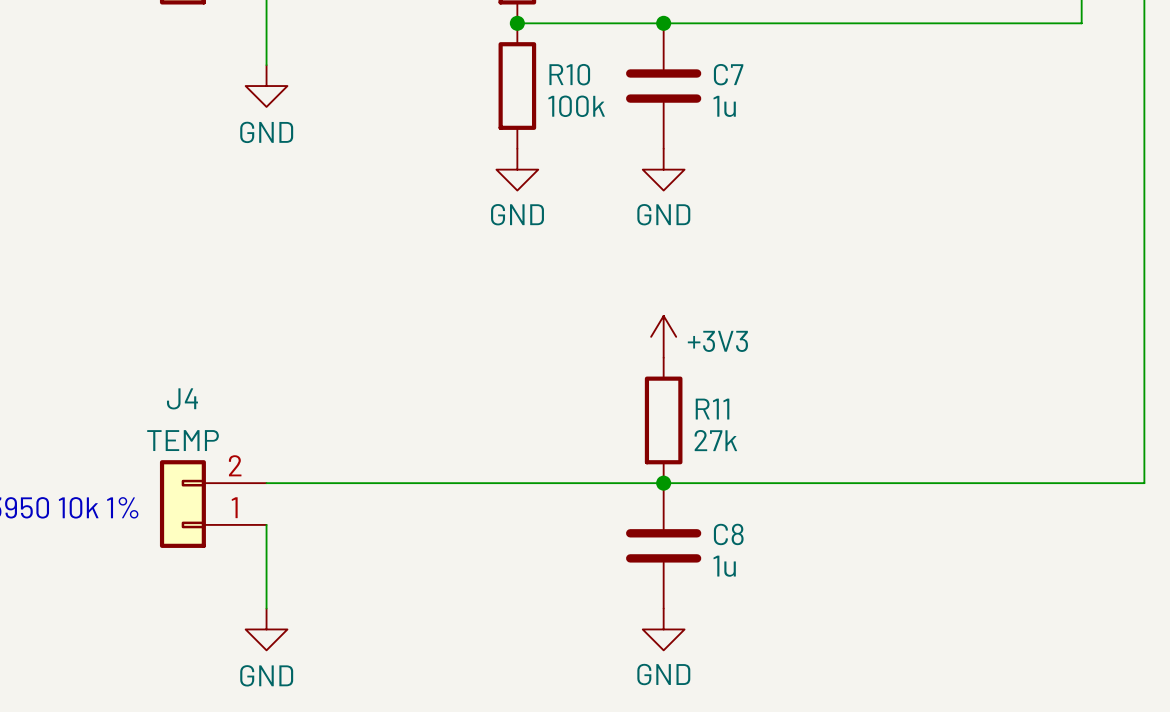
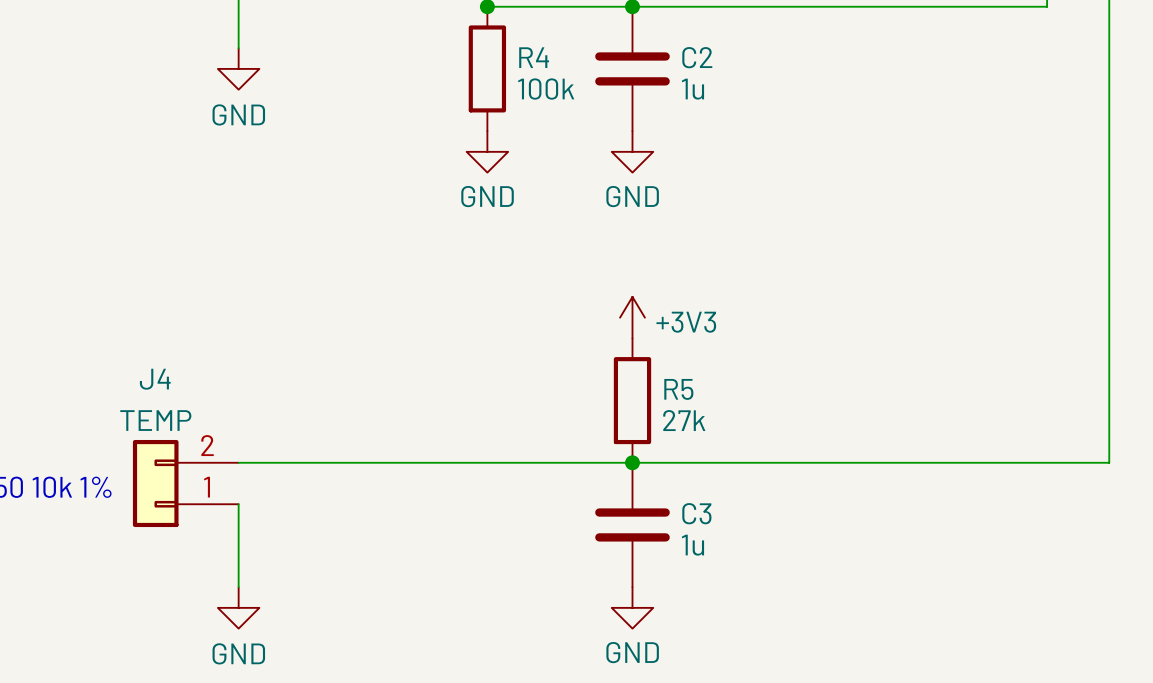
R10 name: R10 (569, 74) -> R4 (534, 57)
C7 name: C7 (728, 74) -> C2 (697, 57)
R11 name: R11 (712, 409) -> R5 (678, 389)
C8 name: C8 (728, 534) -> C3 (696, 513)

